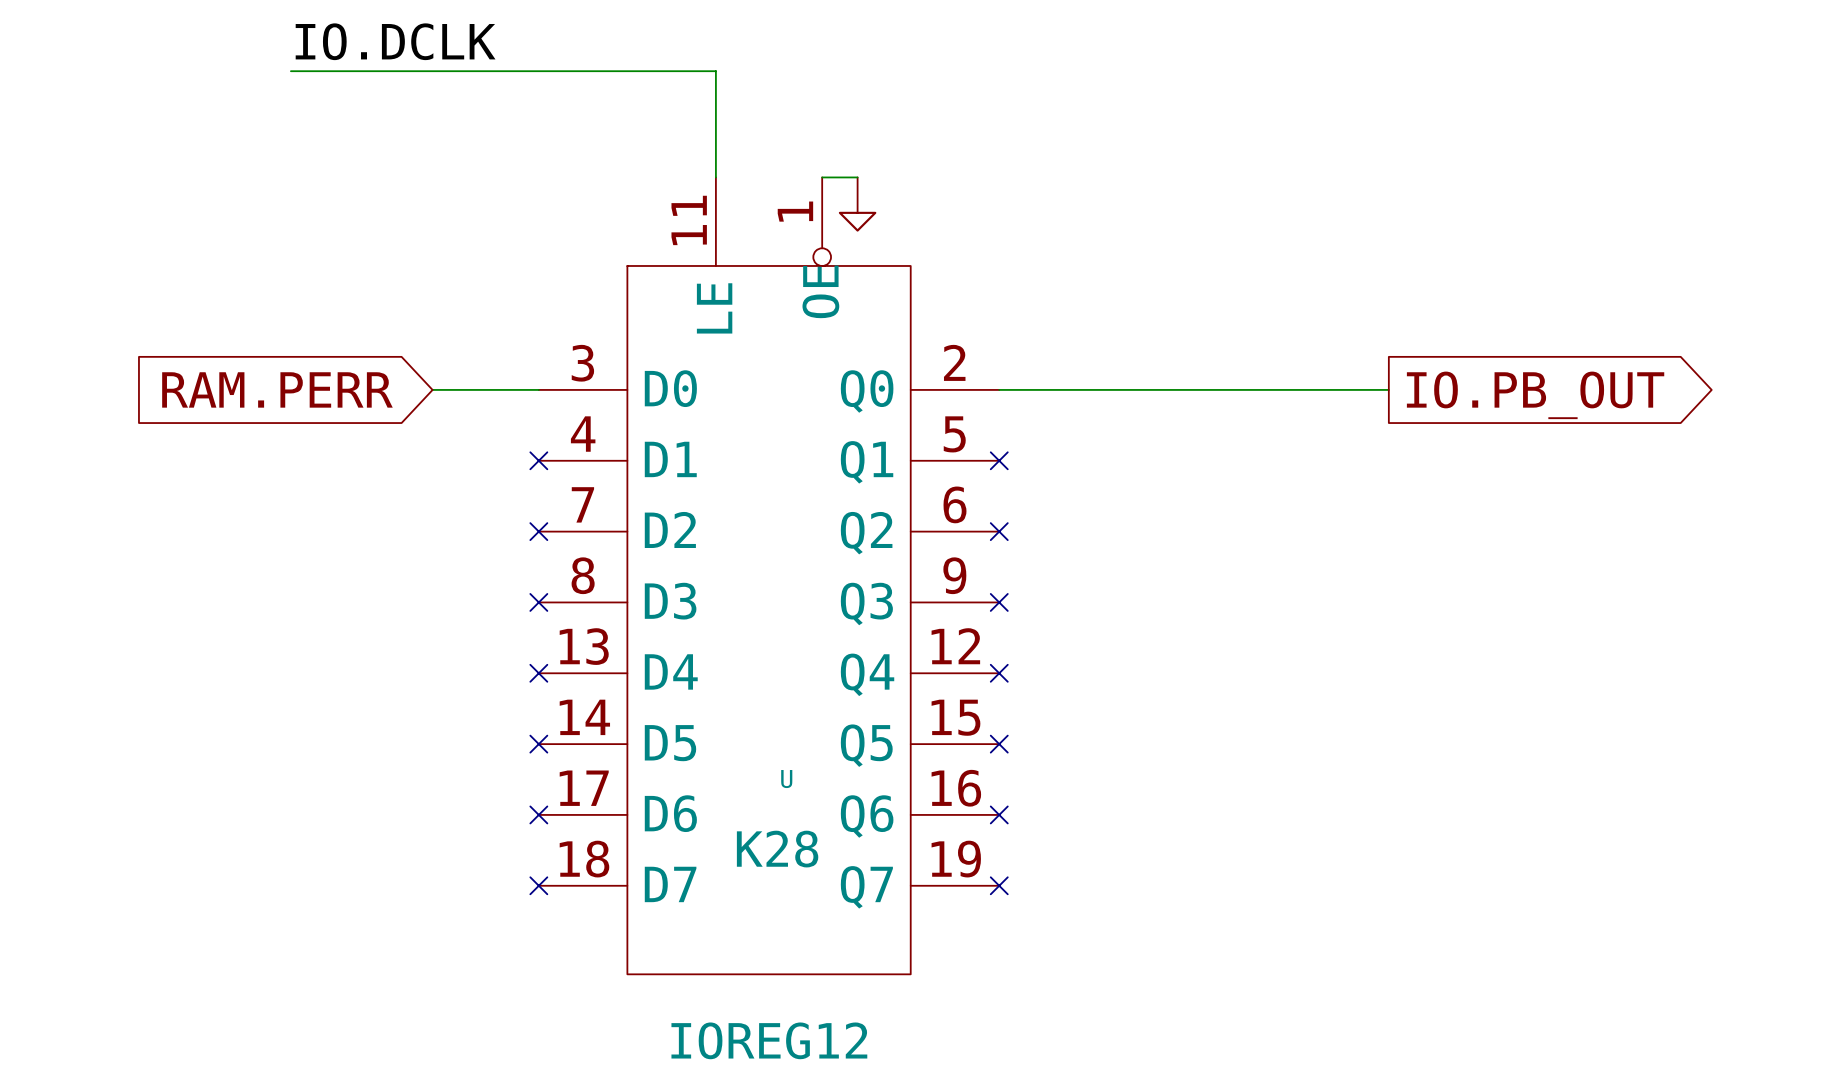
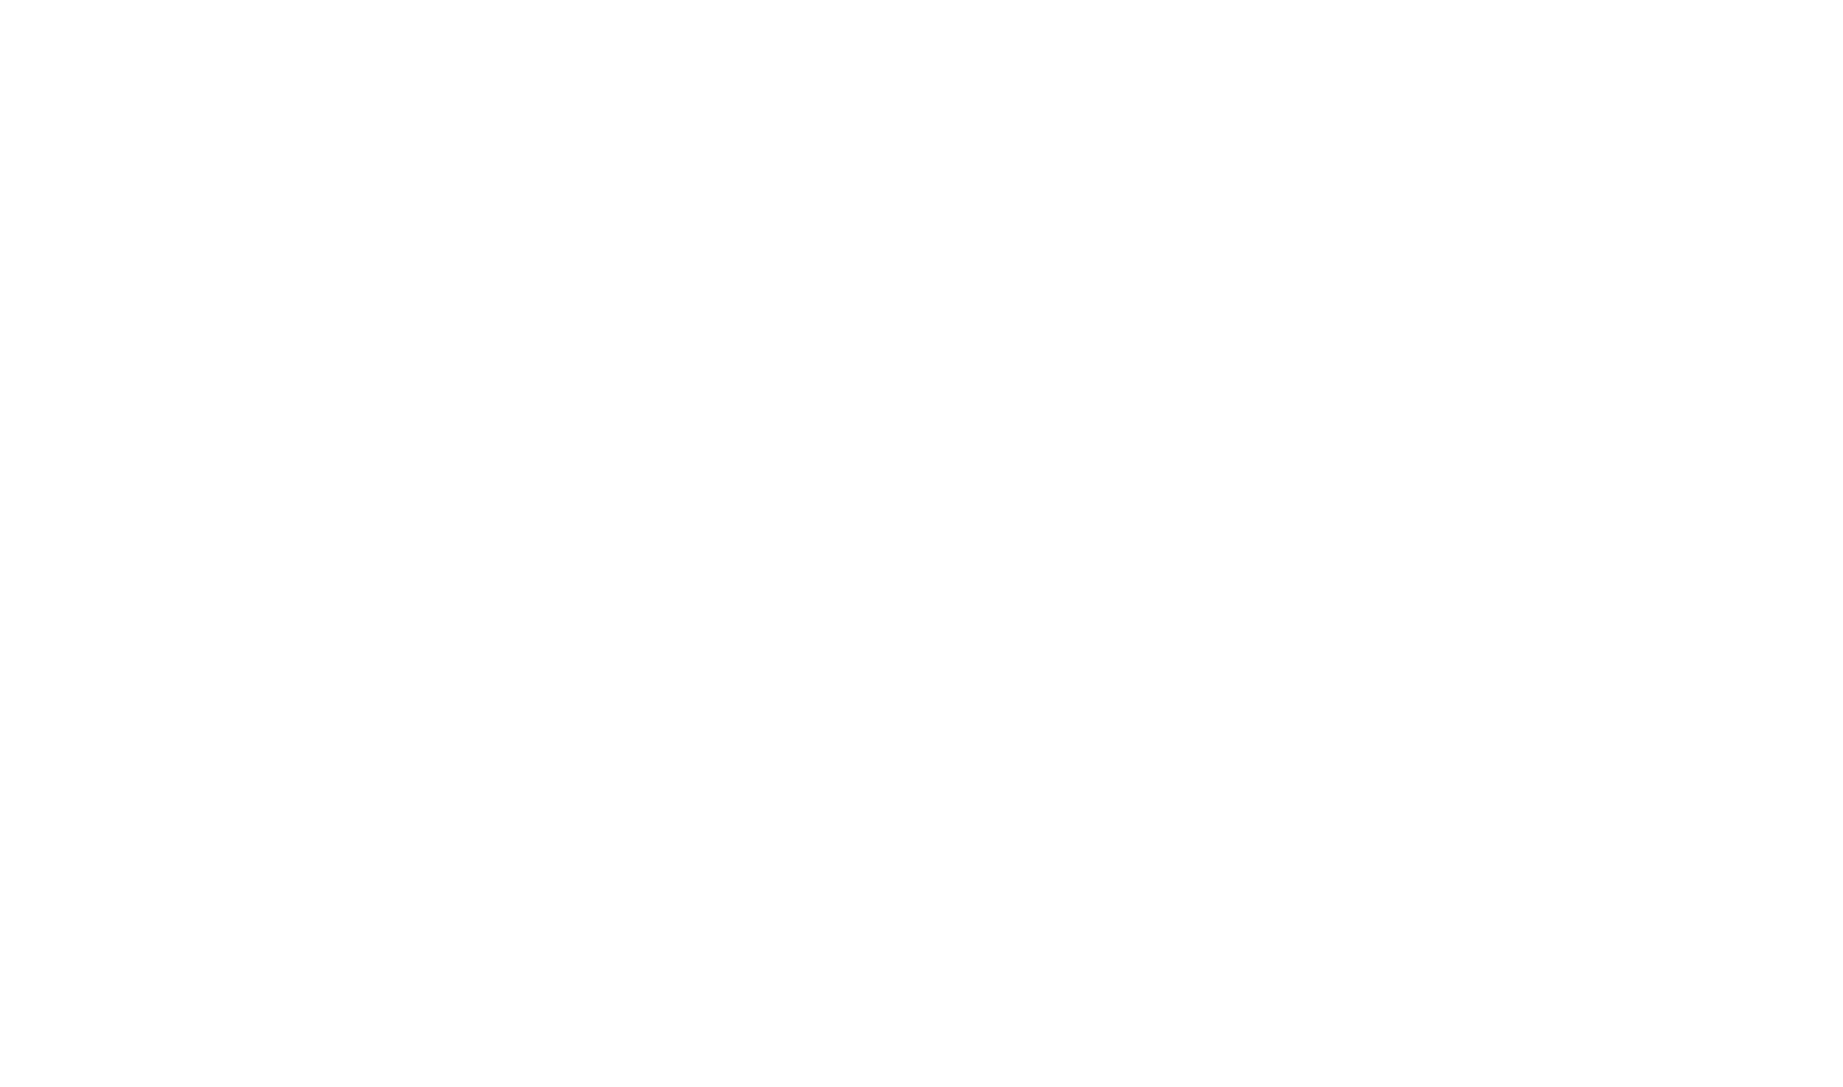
label: IO.DCLK (395, 41) -> none
wire: (290, 71) (715, 71) (715, 177) -> none
wire: (822, 177) (857, 177) -> none
power symbol: (857, 204) -> none
global label: RAM.PERR (277, 389) -> none
wire: (432, 389) (538, 389) -> none
wire: (999, 389) (1388, 389) -> none
global label: IO.PB_OUT (1535, 395) -> none
no-connect mark: (538, 460) -> none
no-connect mark: (999, 460) -> none
no-connect mark: (538, 531) -> none
no-connect mark: (999, 531) -> none
U: (769, 575) -> none
no-connect mark: (538, 602) -> none
no-connect mark: (999, 602) -> none
no-connect mark: (538, 673) -> none
no-connect mark: (999, 673) -> none
no-connect mark: (538, 744) -> none
no-connect mark: (999, 744) -> none
no-connect mark: (538, 814) -> none
no-connect mark: (999, 814) -> none
no-connect mark: (538, 885) -> none
no-connect mark: (999, 885) -> none

